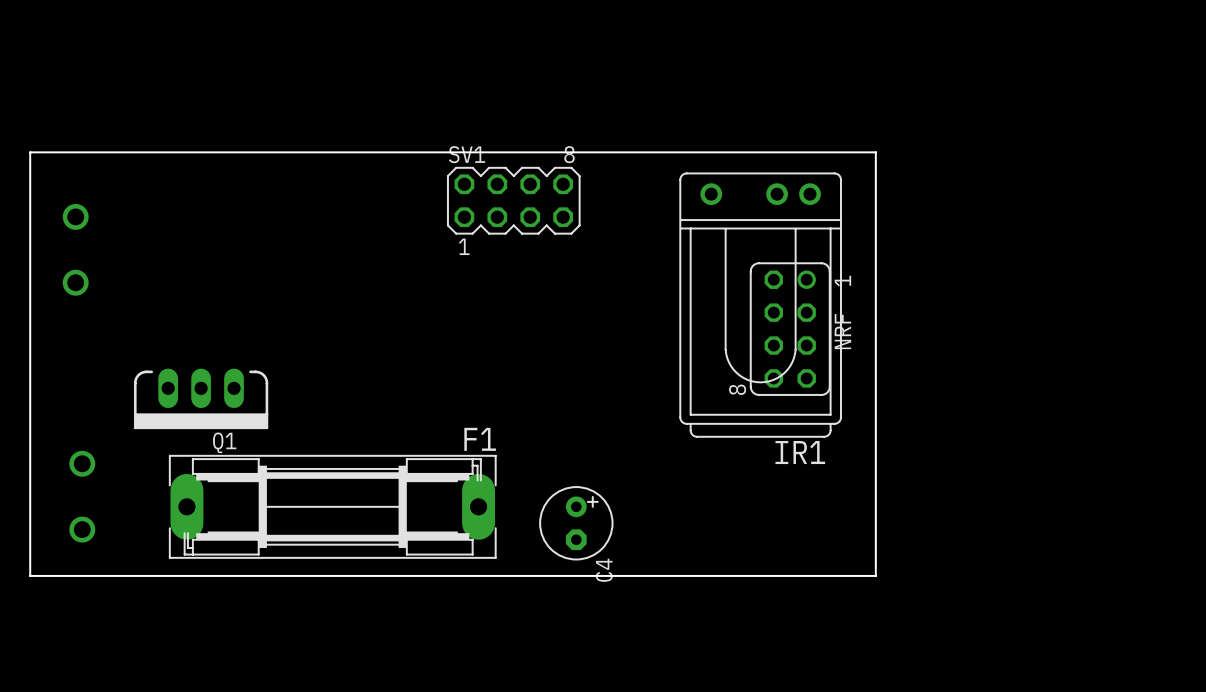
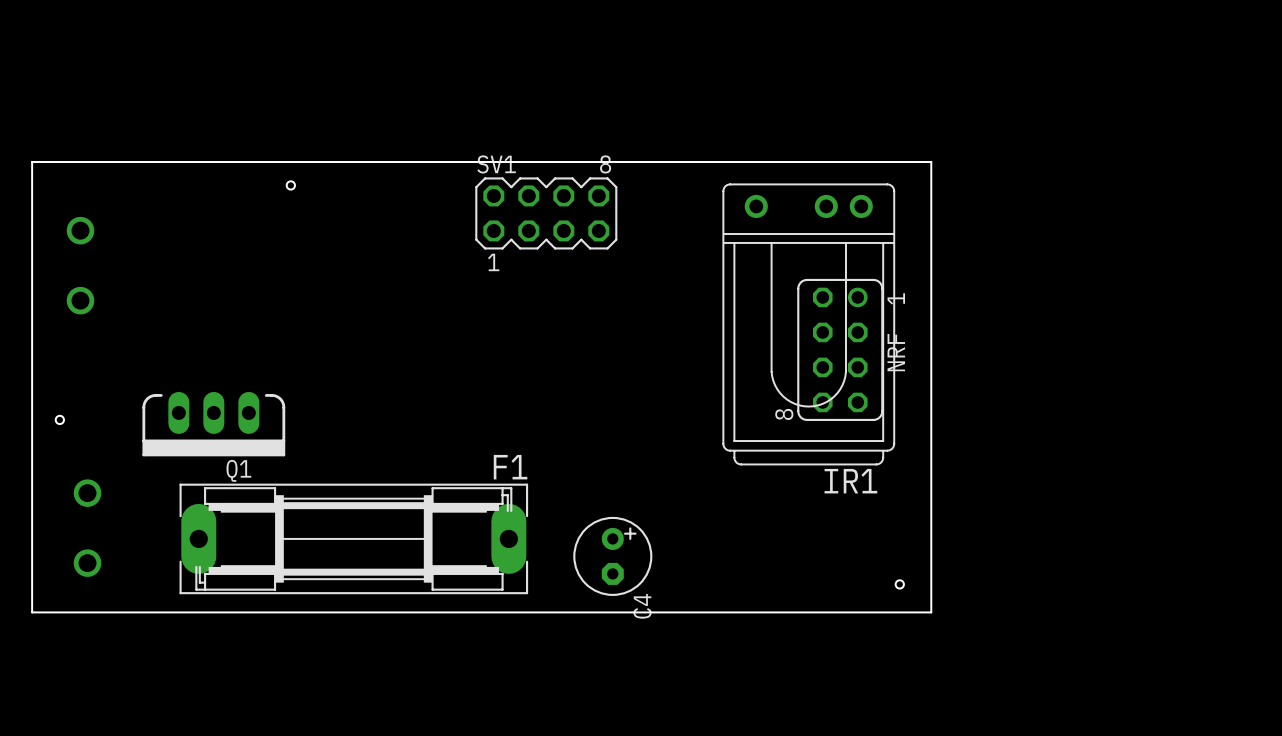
hole: none -> (290, 185)
hole: none -> (59, 419)
hole: none -> (899, 584)

